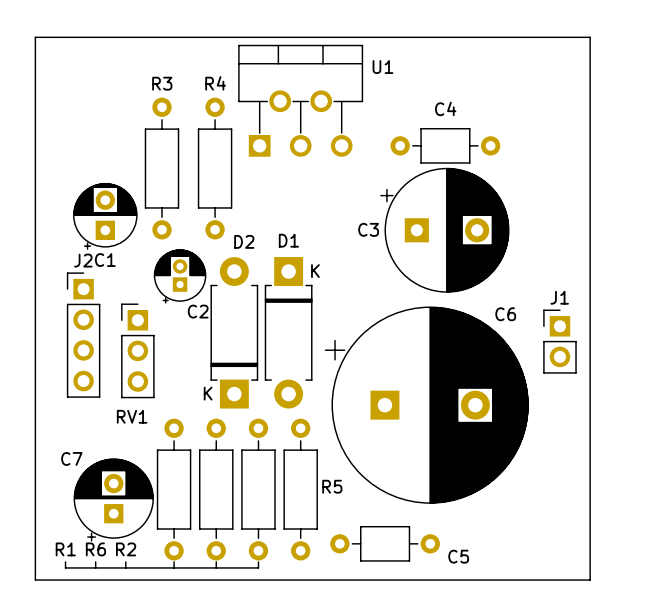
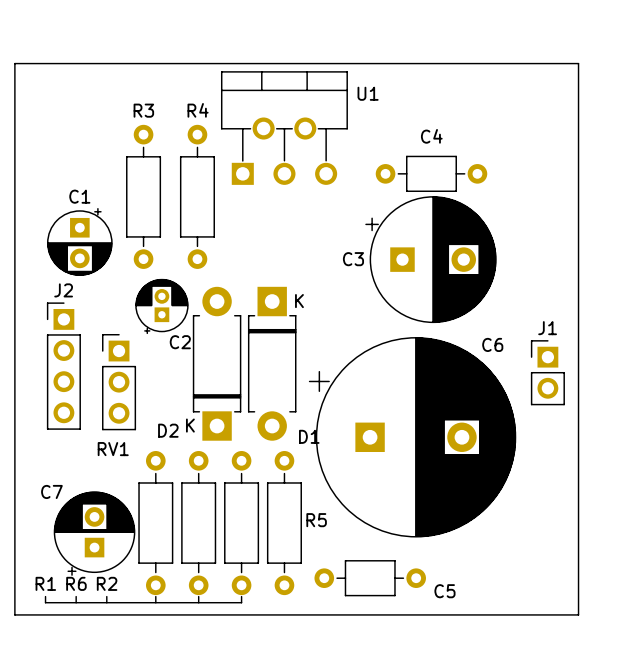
C1 rotation: 0° (105, 216) -> 180° (79, 241)
D1 name position: D1 (288, 240) -> D1 (309, 436)
D2 name position: D2 (244, 241) -> D2 (168, 430)

